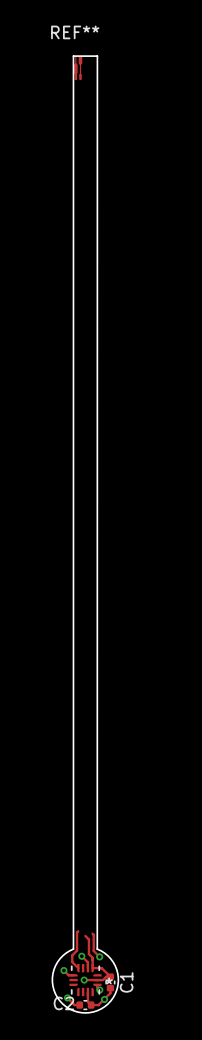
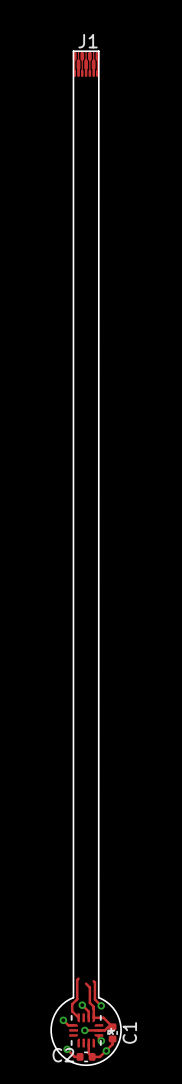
REF**: (78, 67) -> none
J1: none -> (86, 63)

